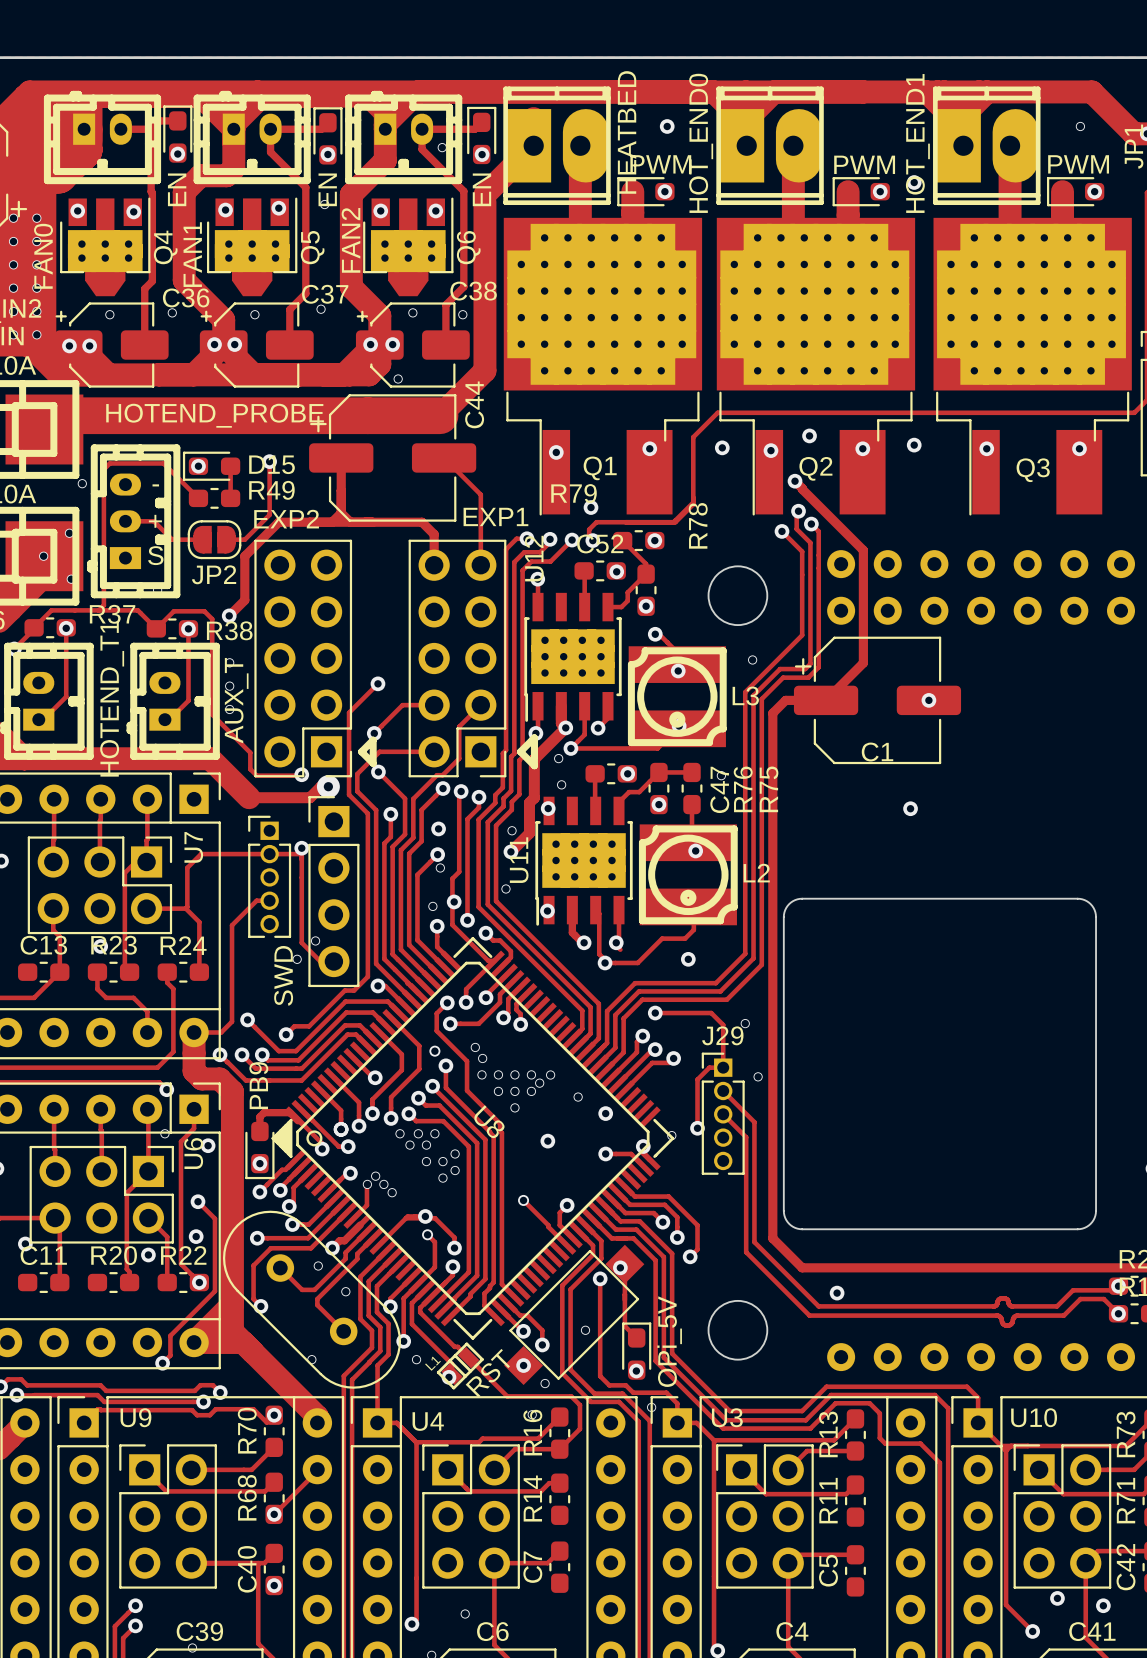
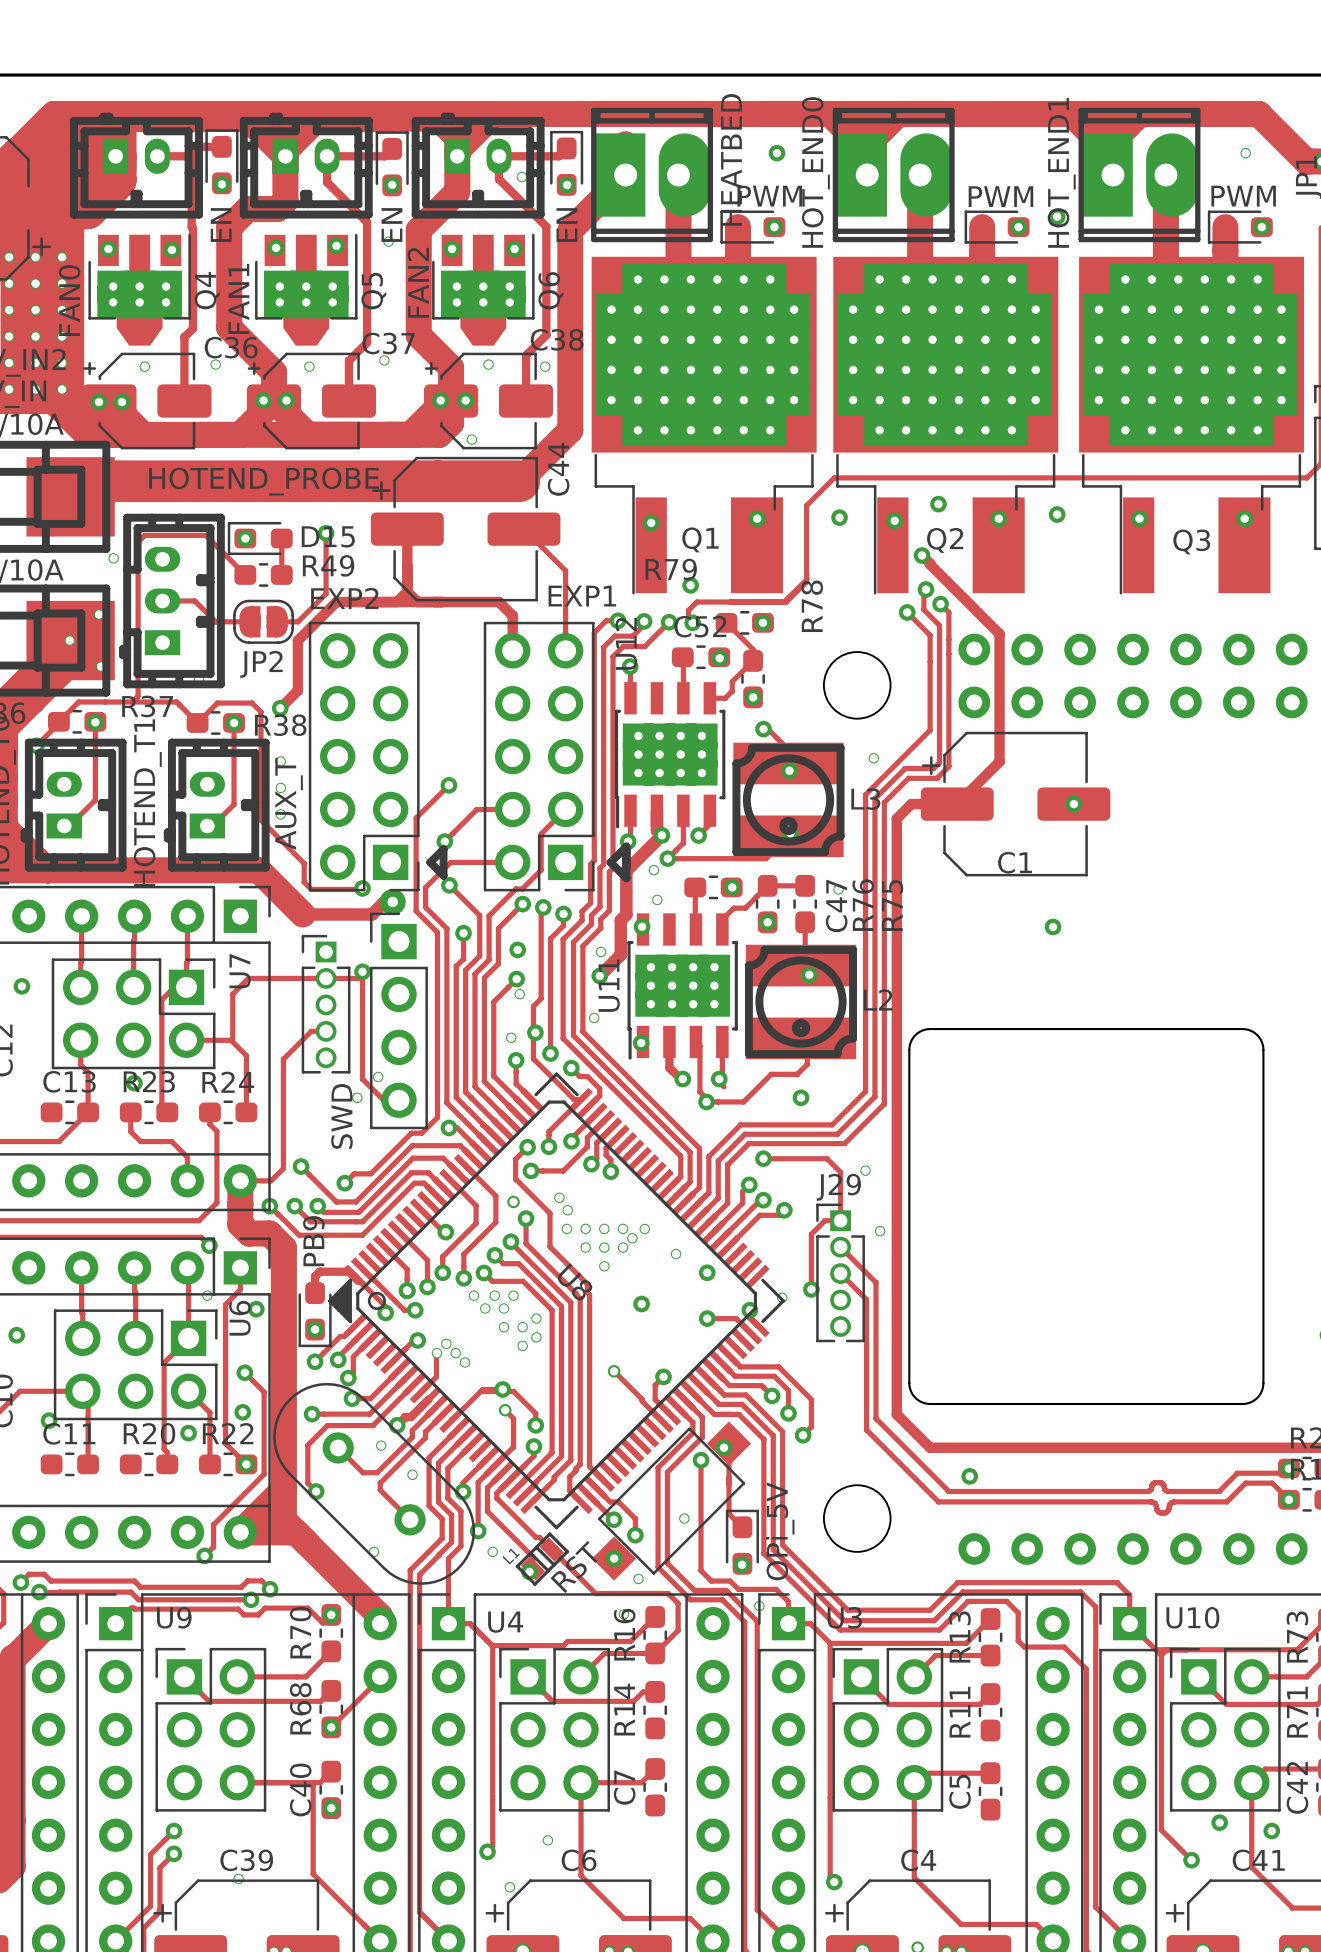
part text: - (155, 485) -> none
part text: + (155, 521) -> none
part text: S (155, 555) -> none

